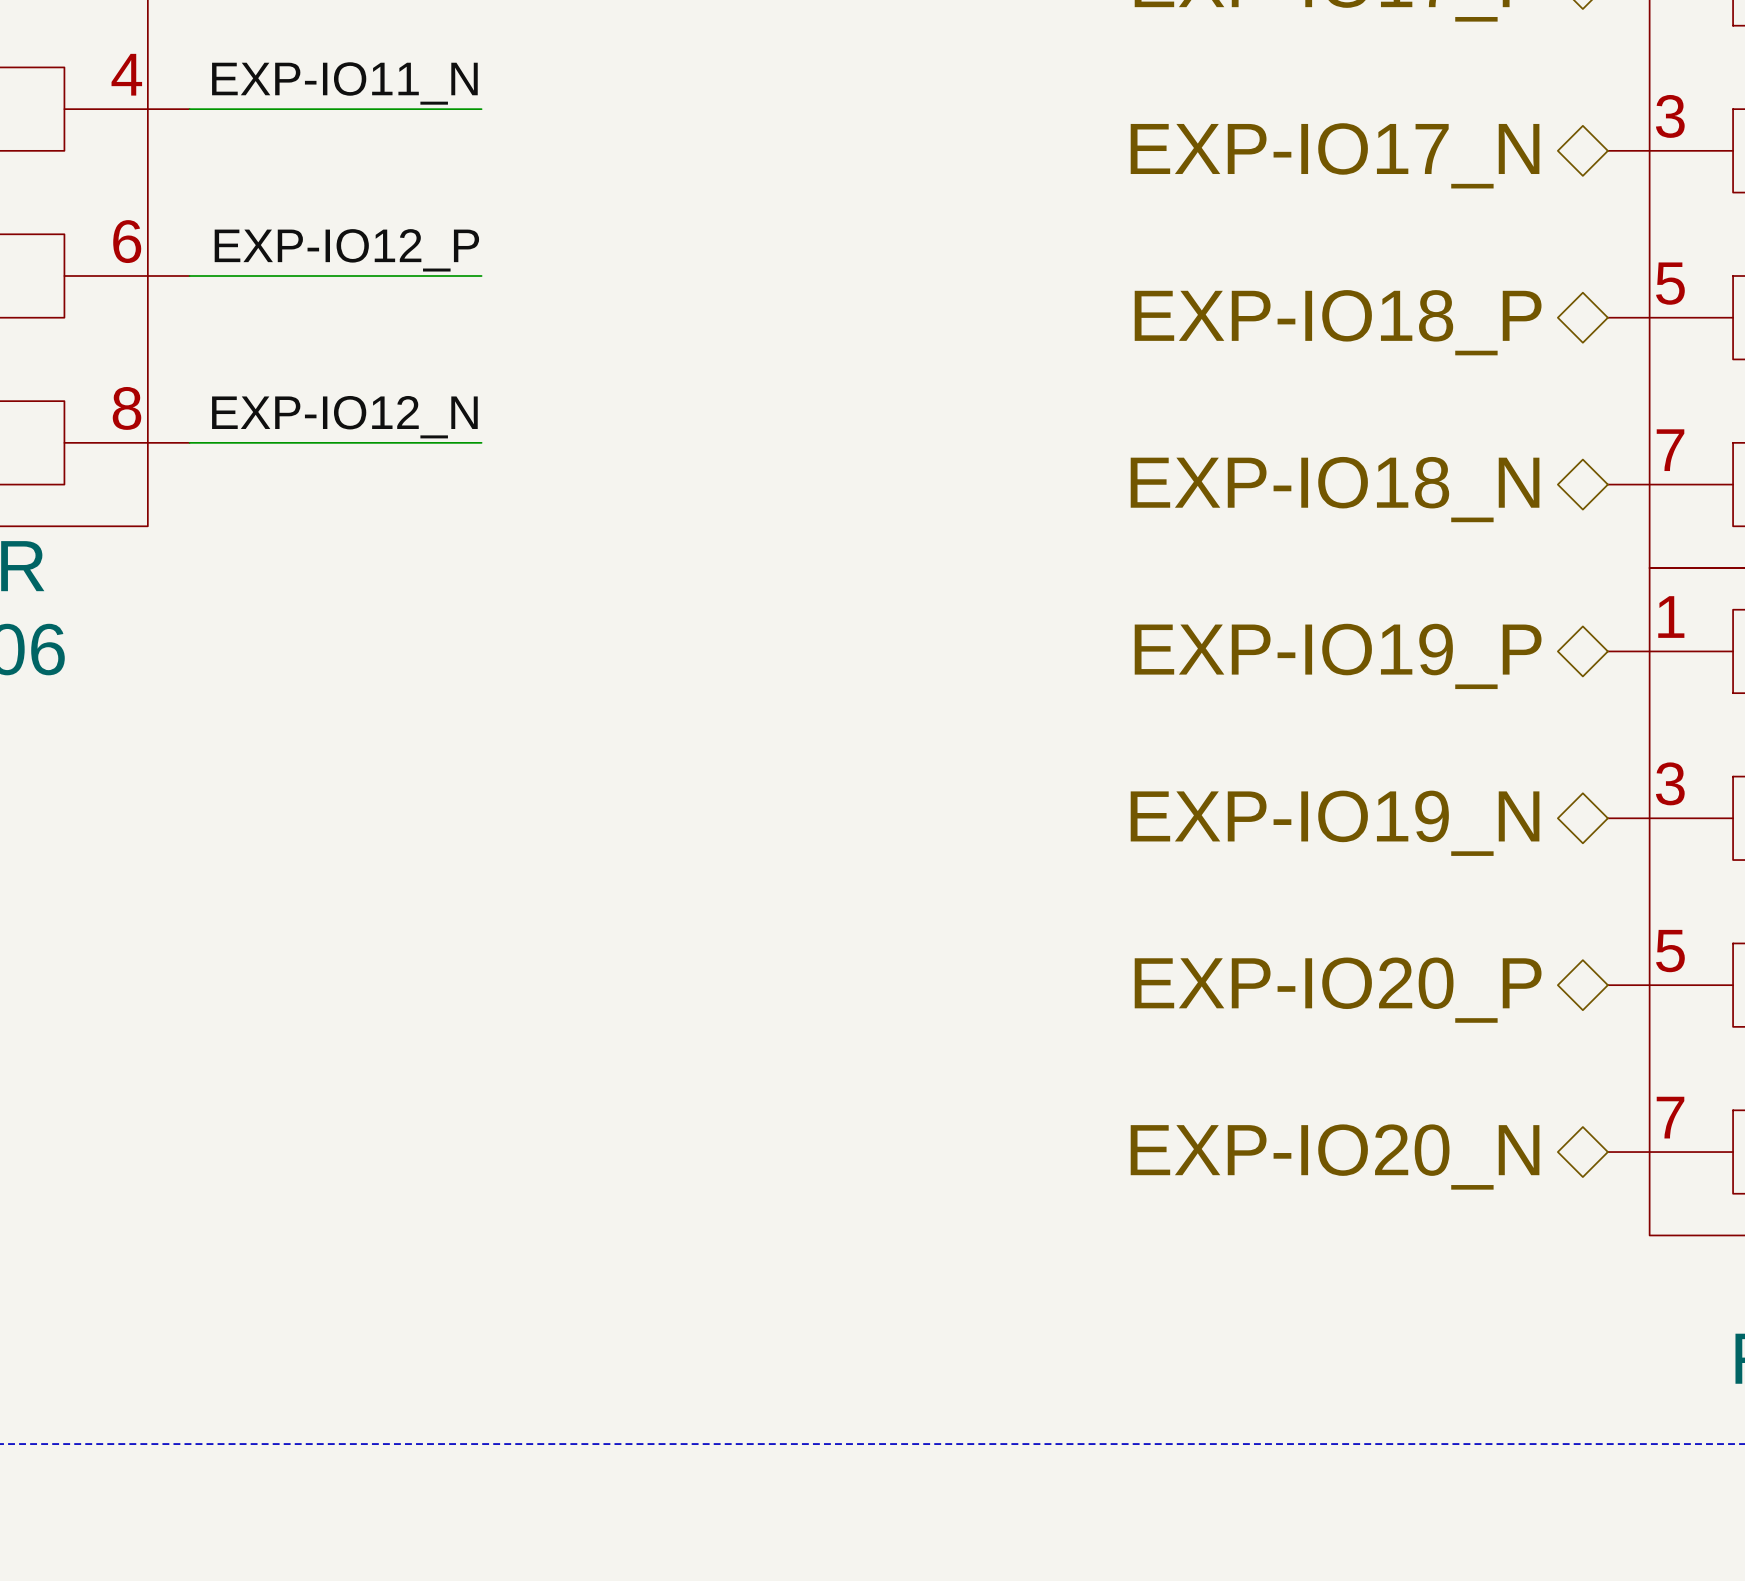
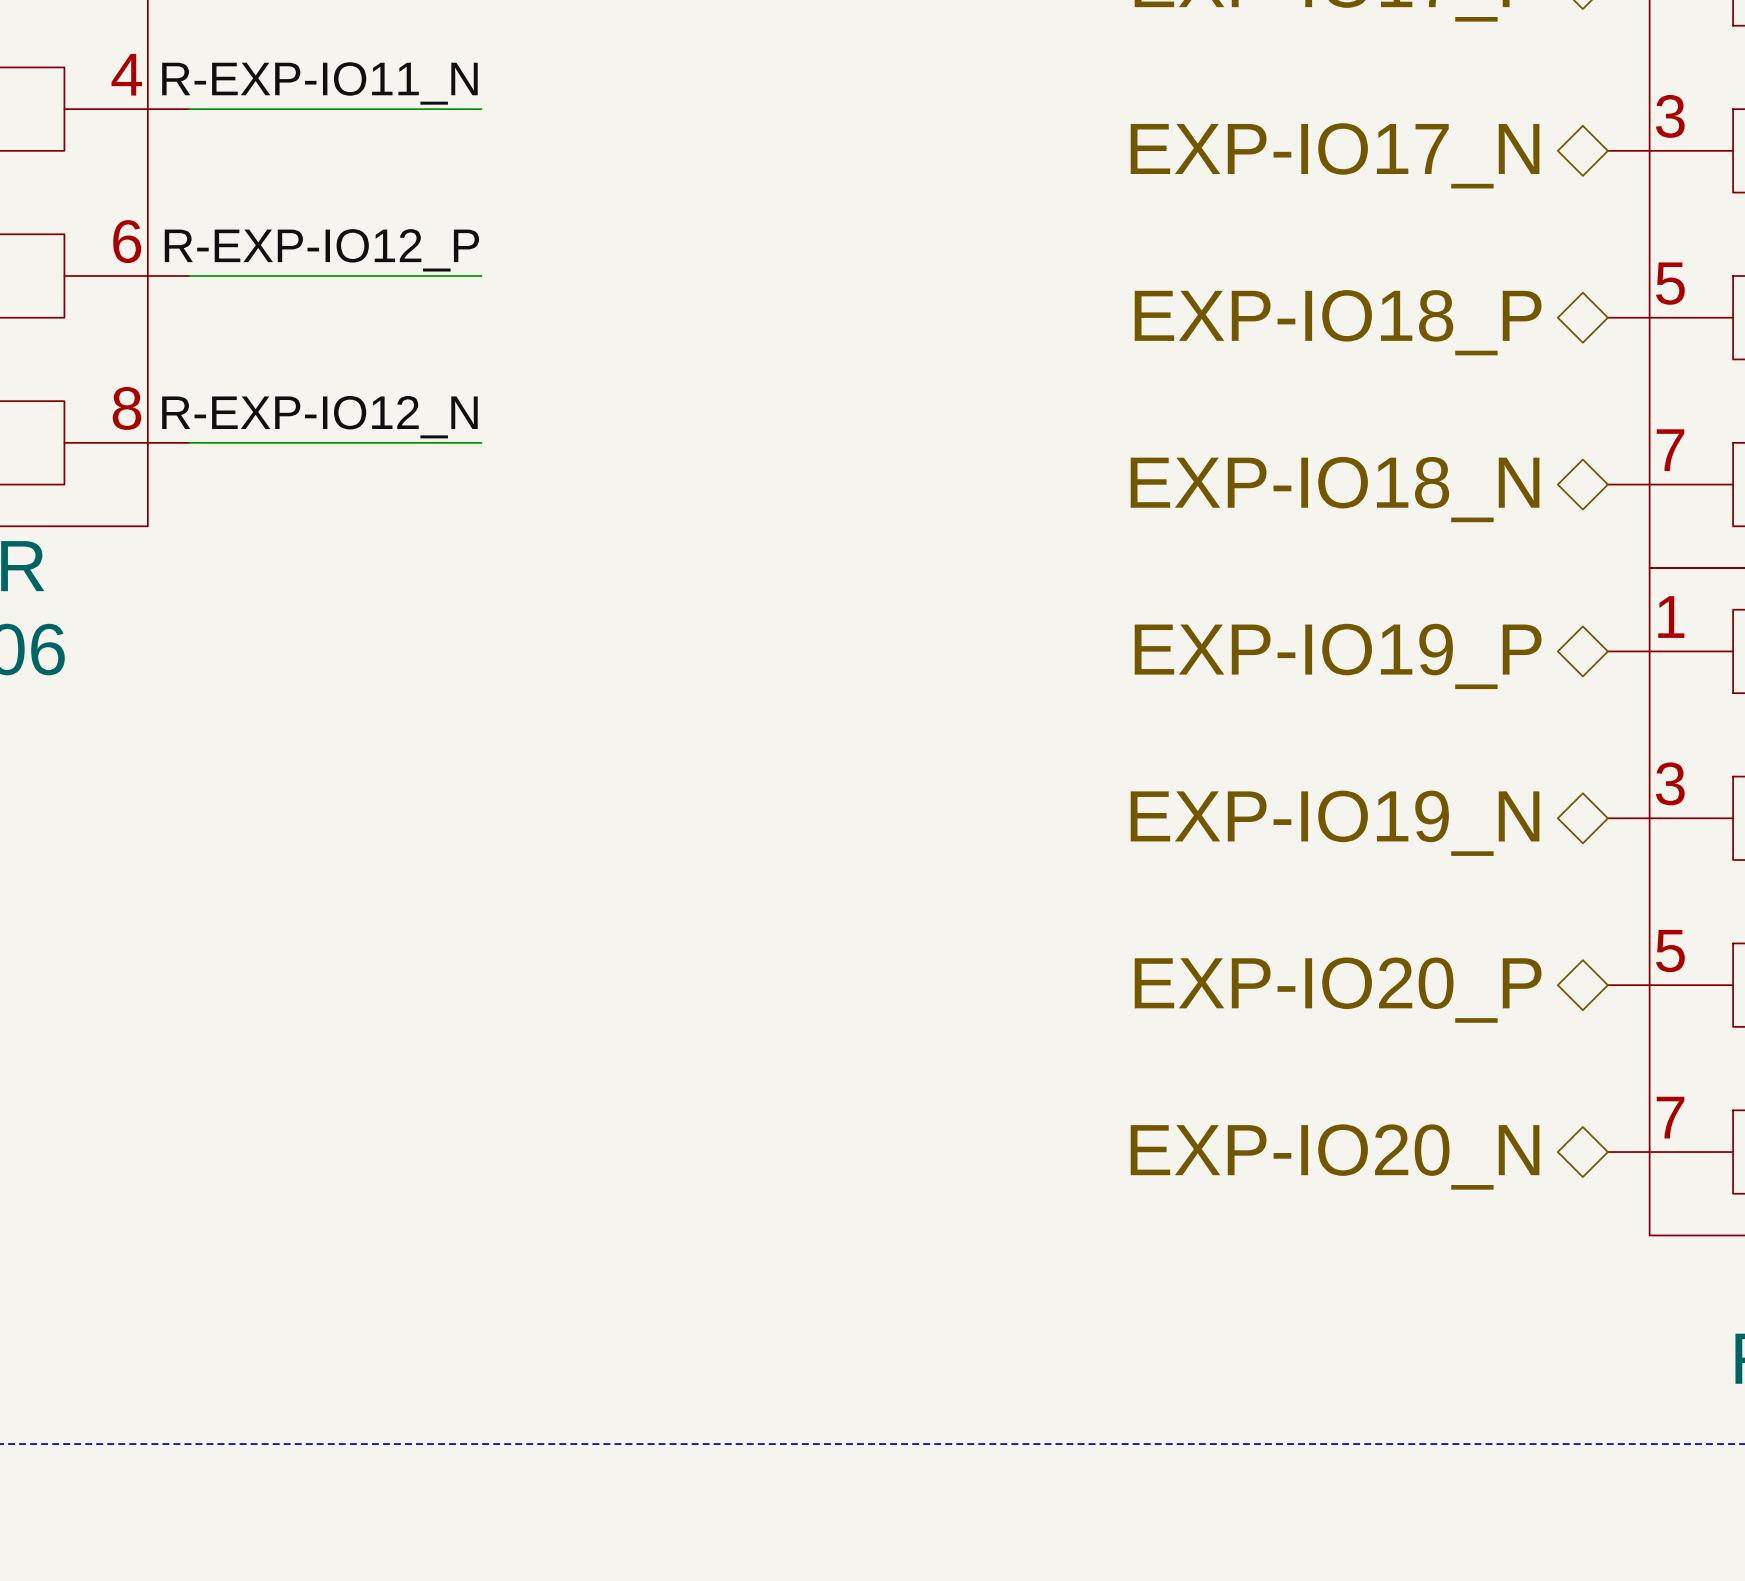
label: EXP-IO11_N (344, 83) -> R-EXP-IO11_N (319, 83)
label: EXP-IO12_P (346, 250) -> R-EXP-IO12_P (321, 250)
label: EXP-IO12_N (344, 417) -> R-EXP-IO12_N (319, 417)

